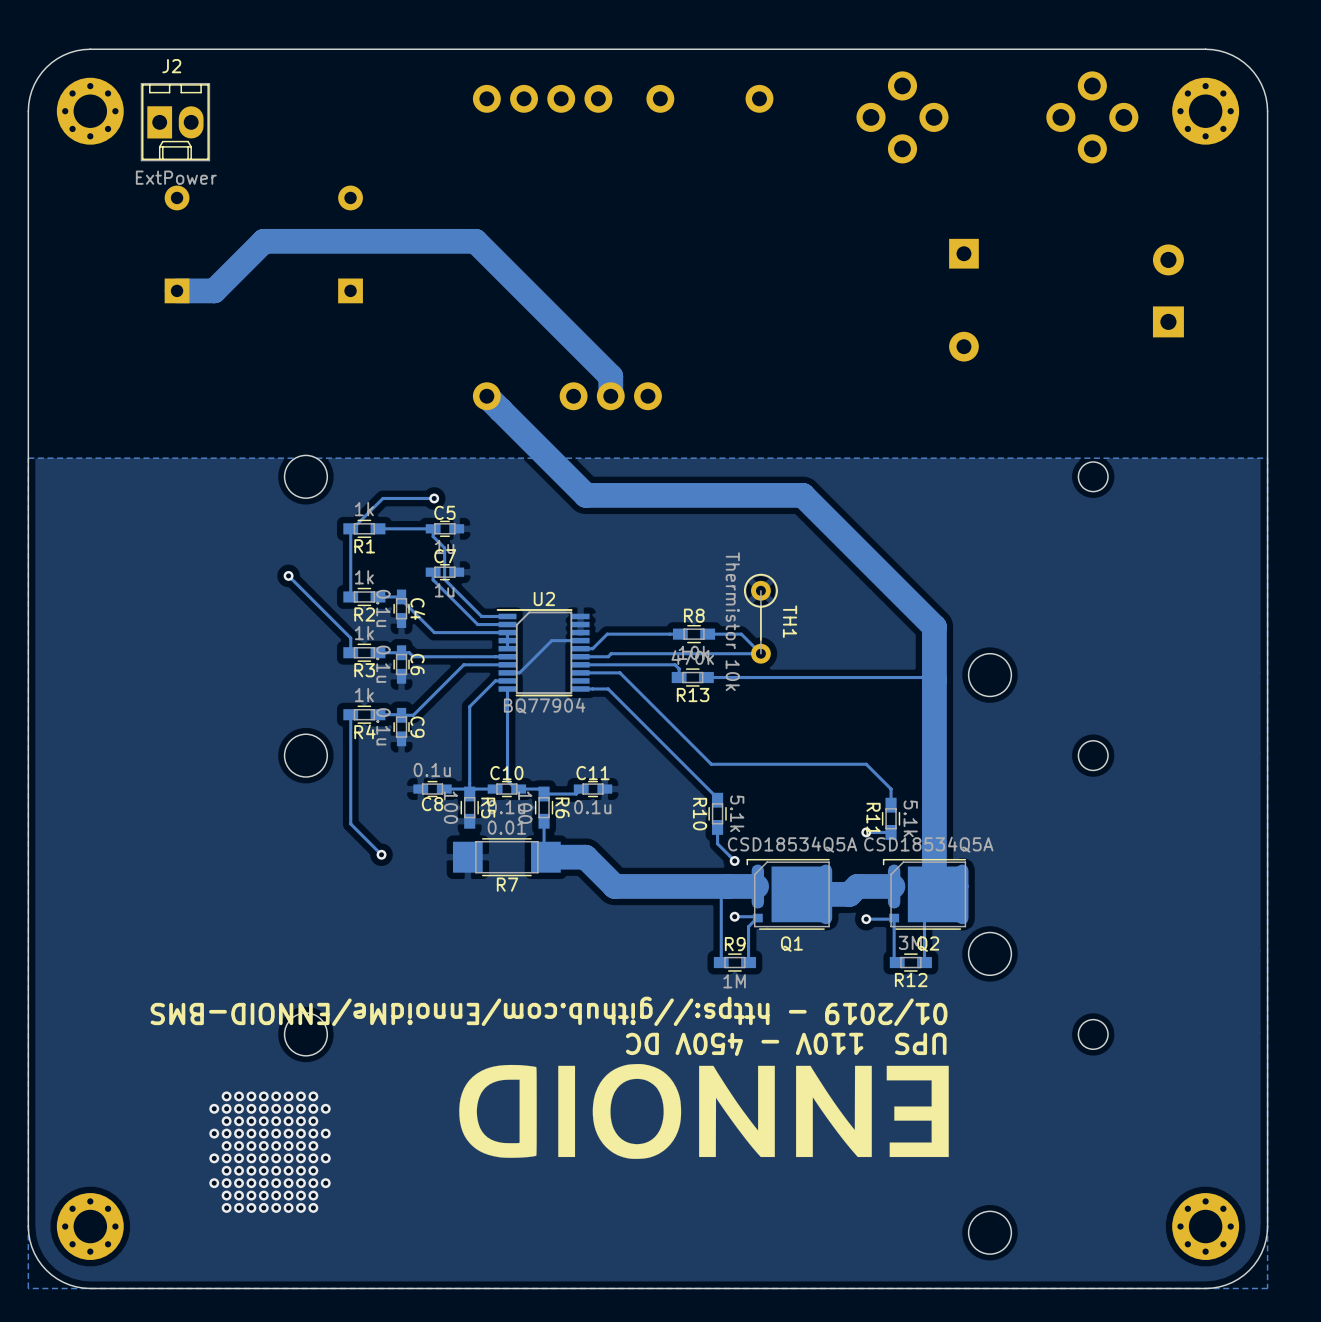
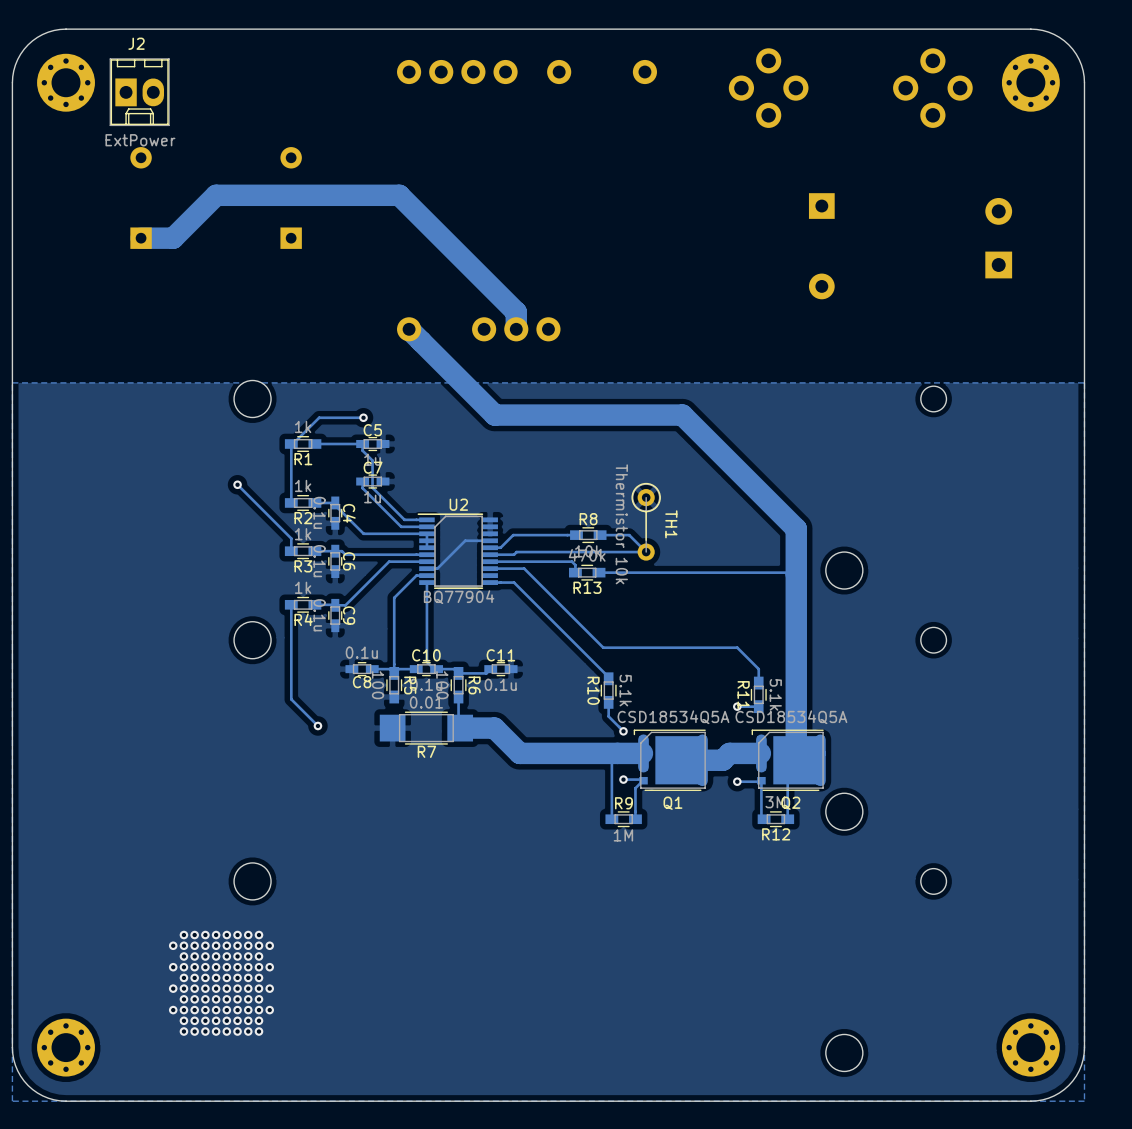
text: 01/2019 - https://github.com/EnnoidMe/ENNOID-BMS (549, 1011) -> none
text: UPS 110V - 450V DC (786, 1044) -> none
drawing: [459, 1064, 949, 1159] -> none

